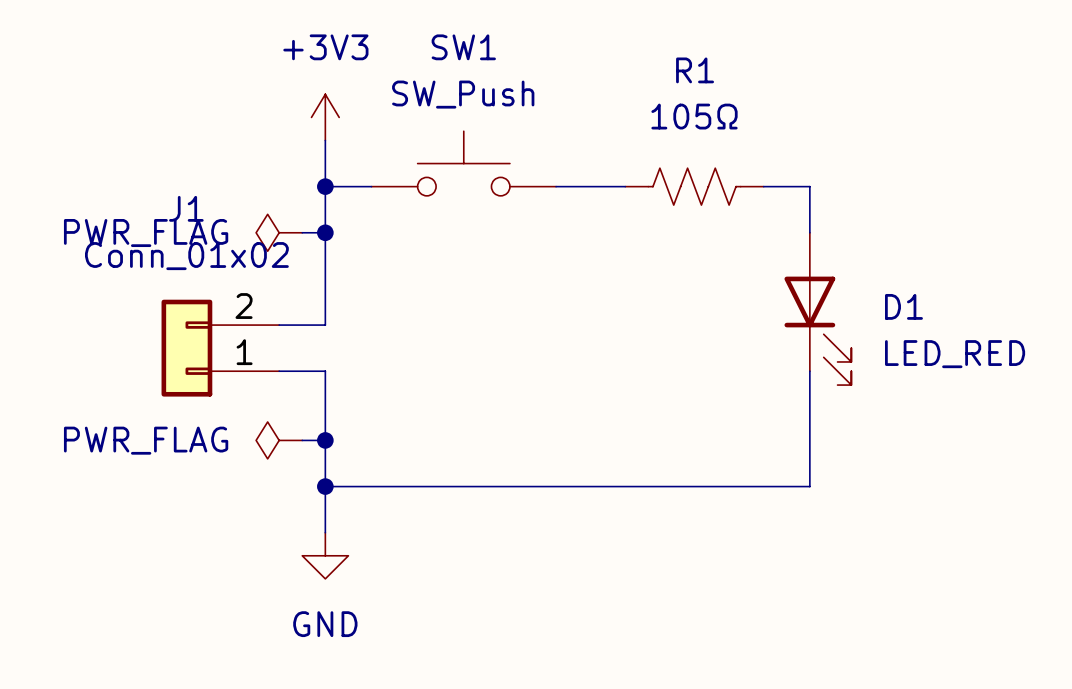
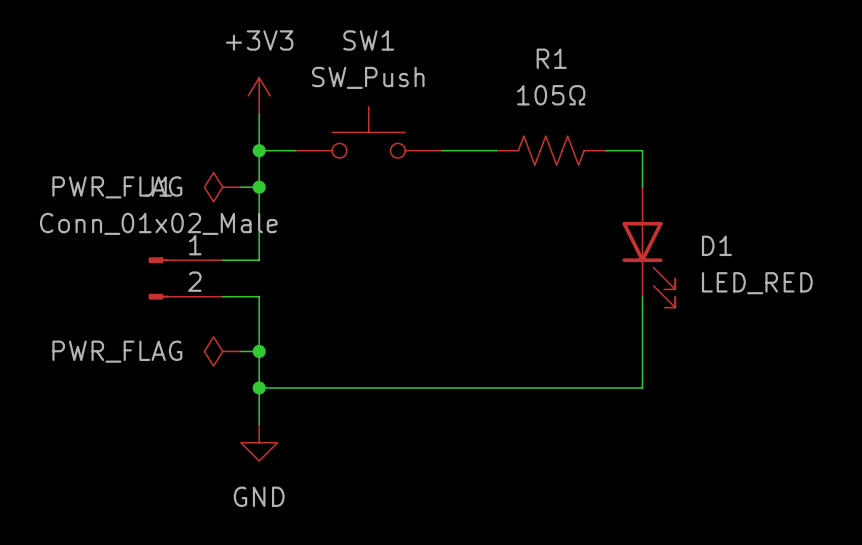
J1 value: Conn_01x02 (186, 256) -> Conn_01x02_Male (158, 223)
J1 symbol: [161, 299, 280, 397] -> [148, 257, 223, 300]

